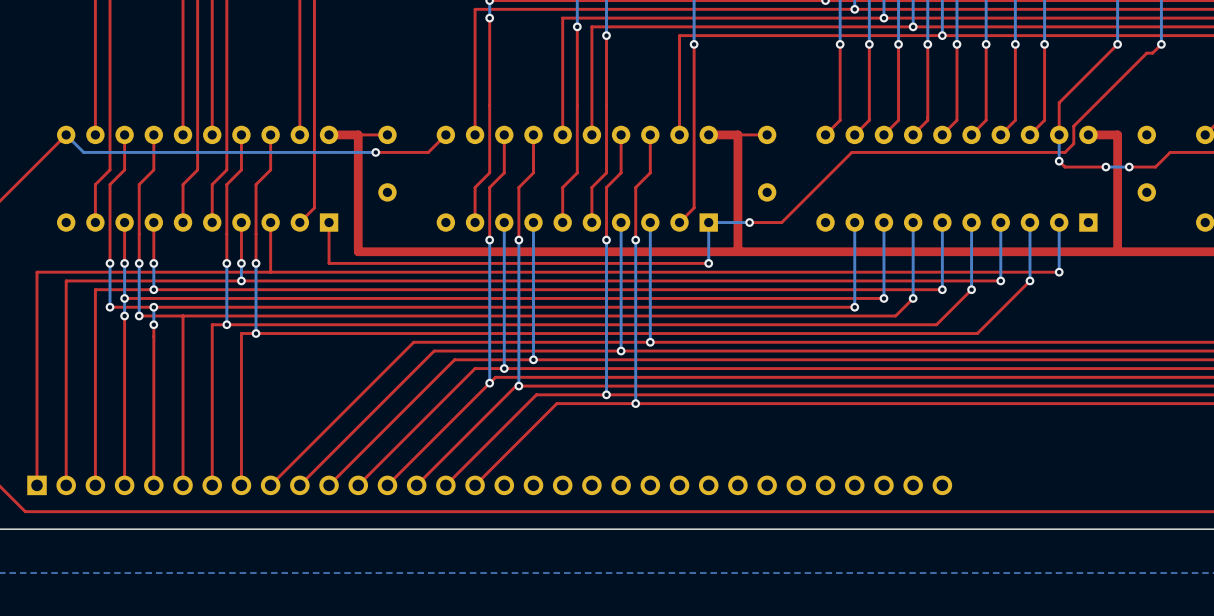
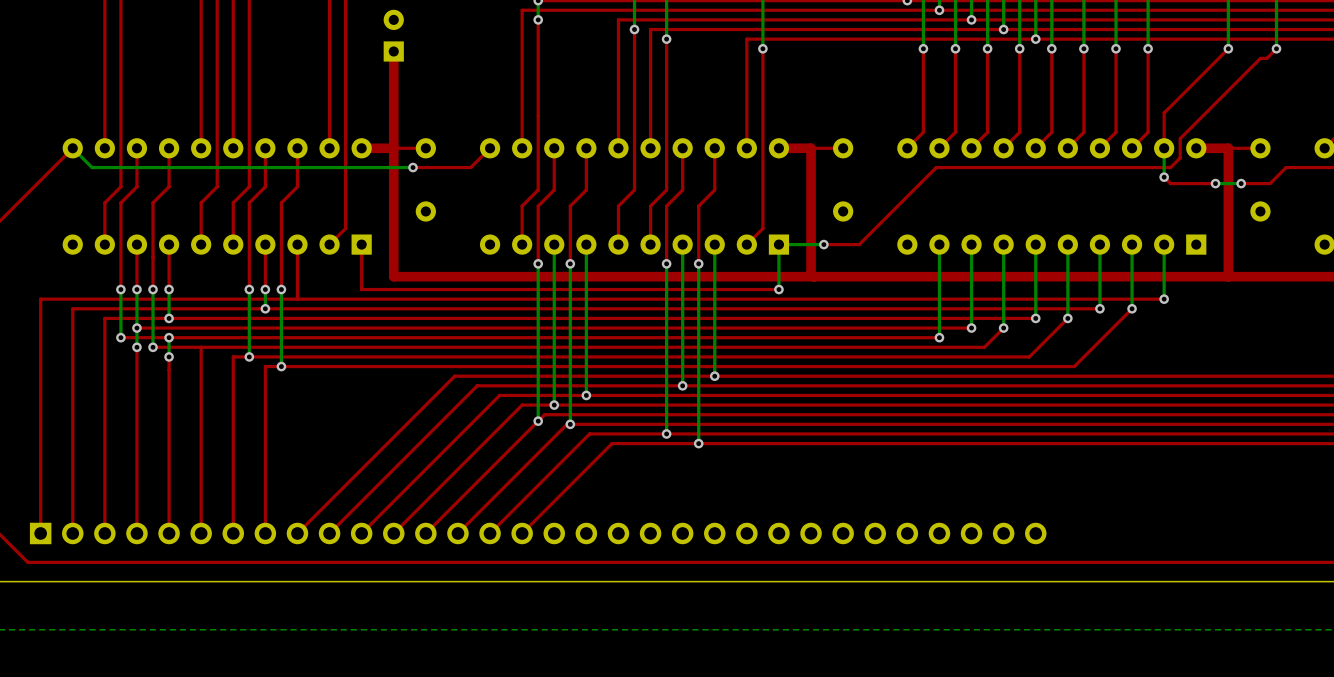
part: none -> (393, 35)
top track: none -> (393, 51) (393, 148)
top track: none -> (1260, 148) (1228, 148)

